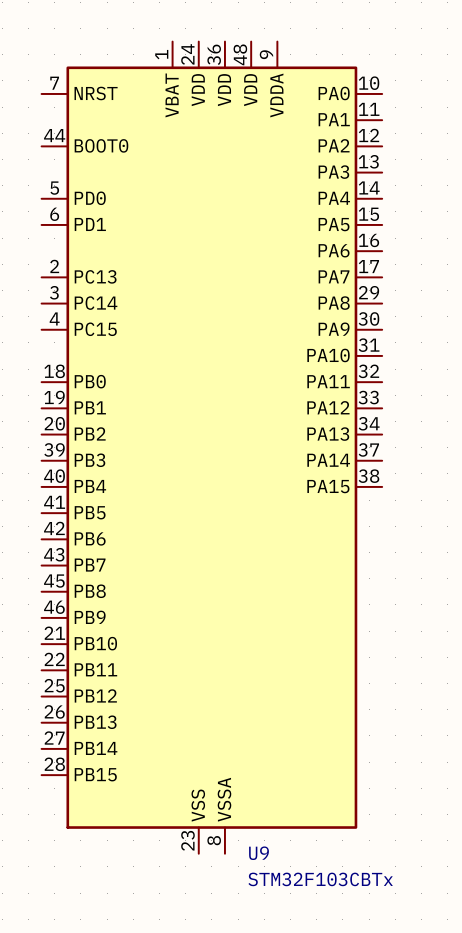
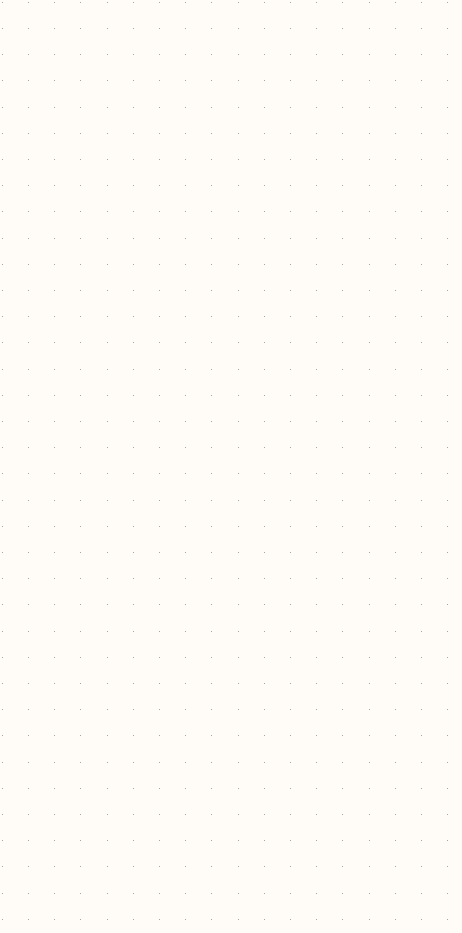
U9: STM32F103CBTx (211, 447) -> none

